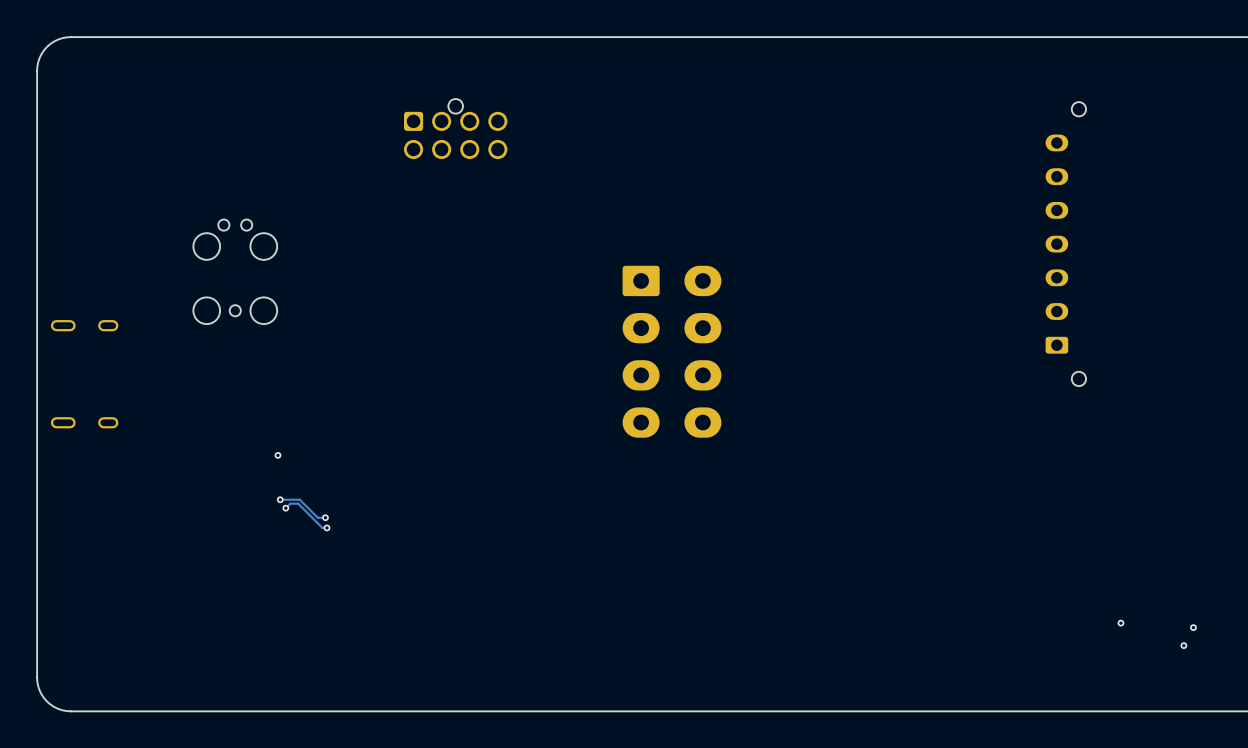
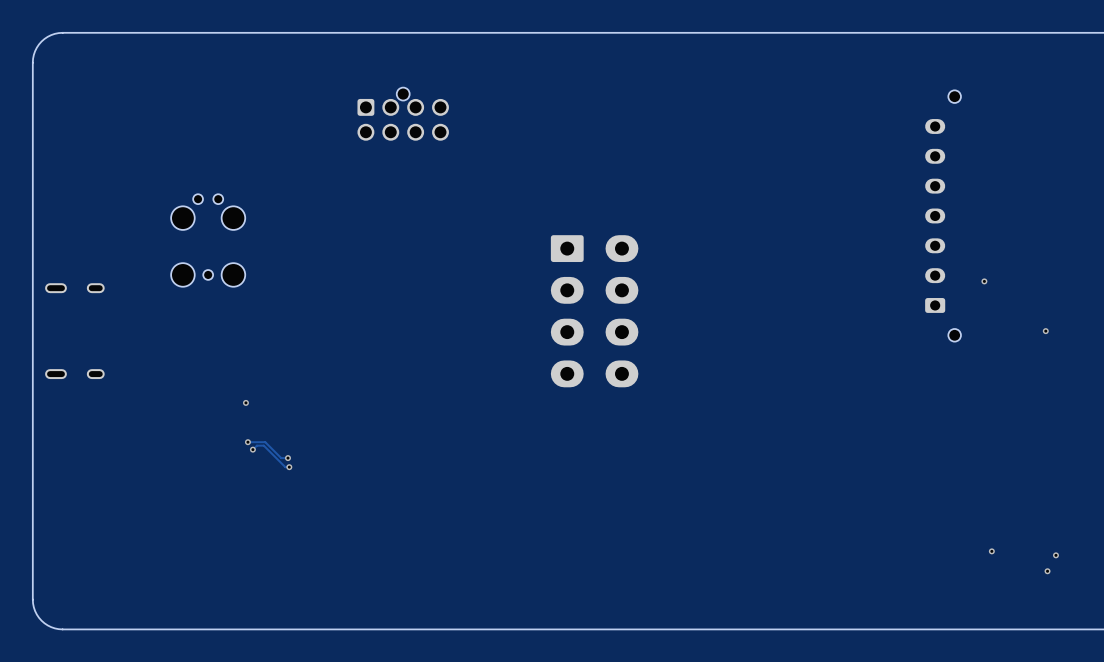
via: none -> (984, 281)
via: none -> (1045, 331)

